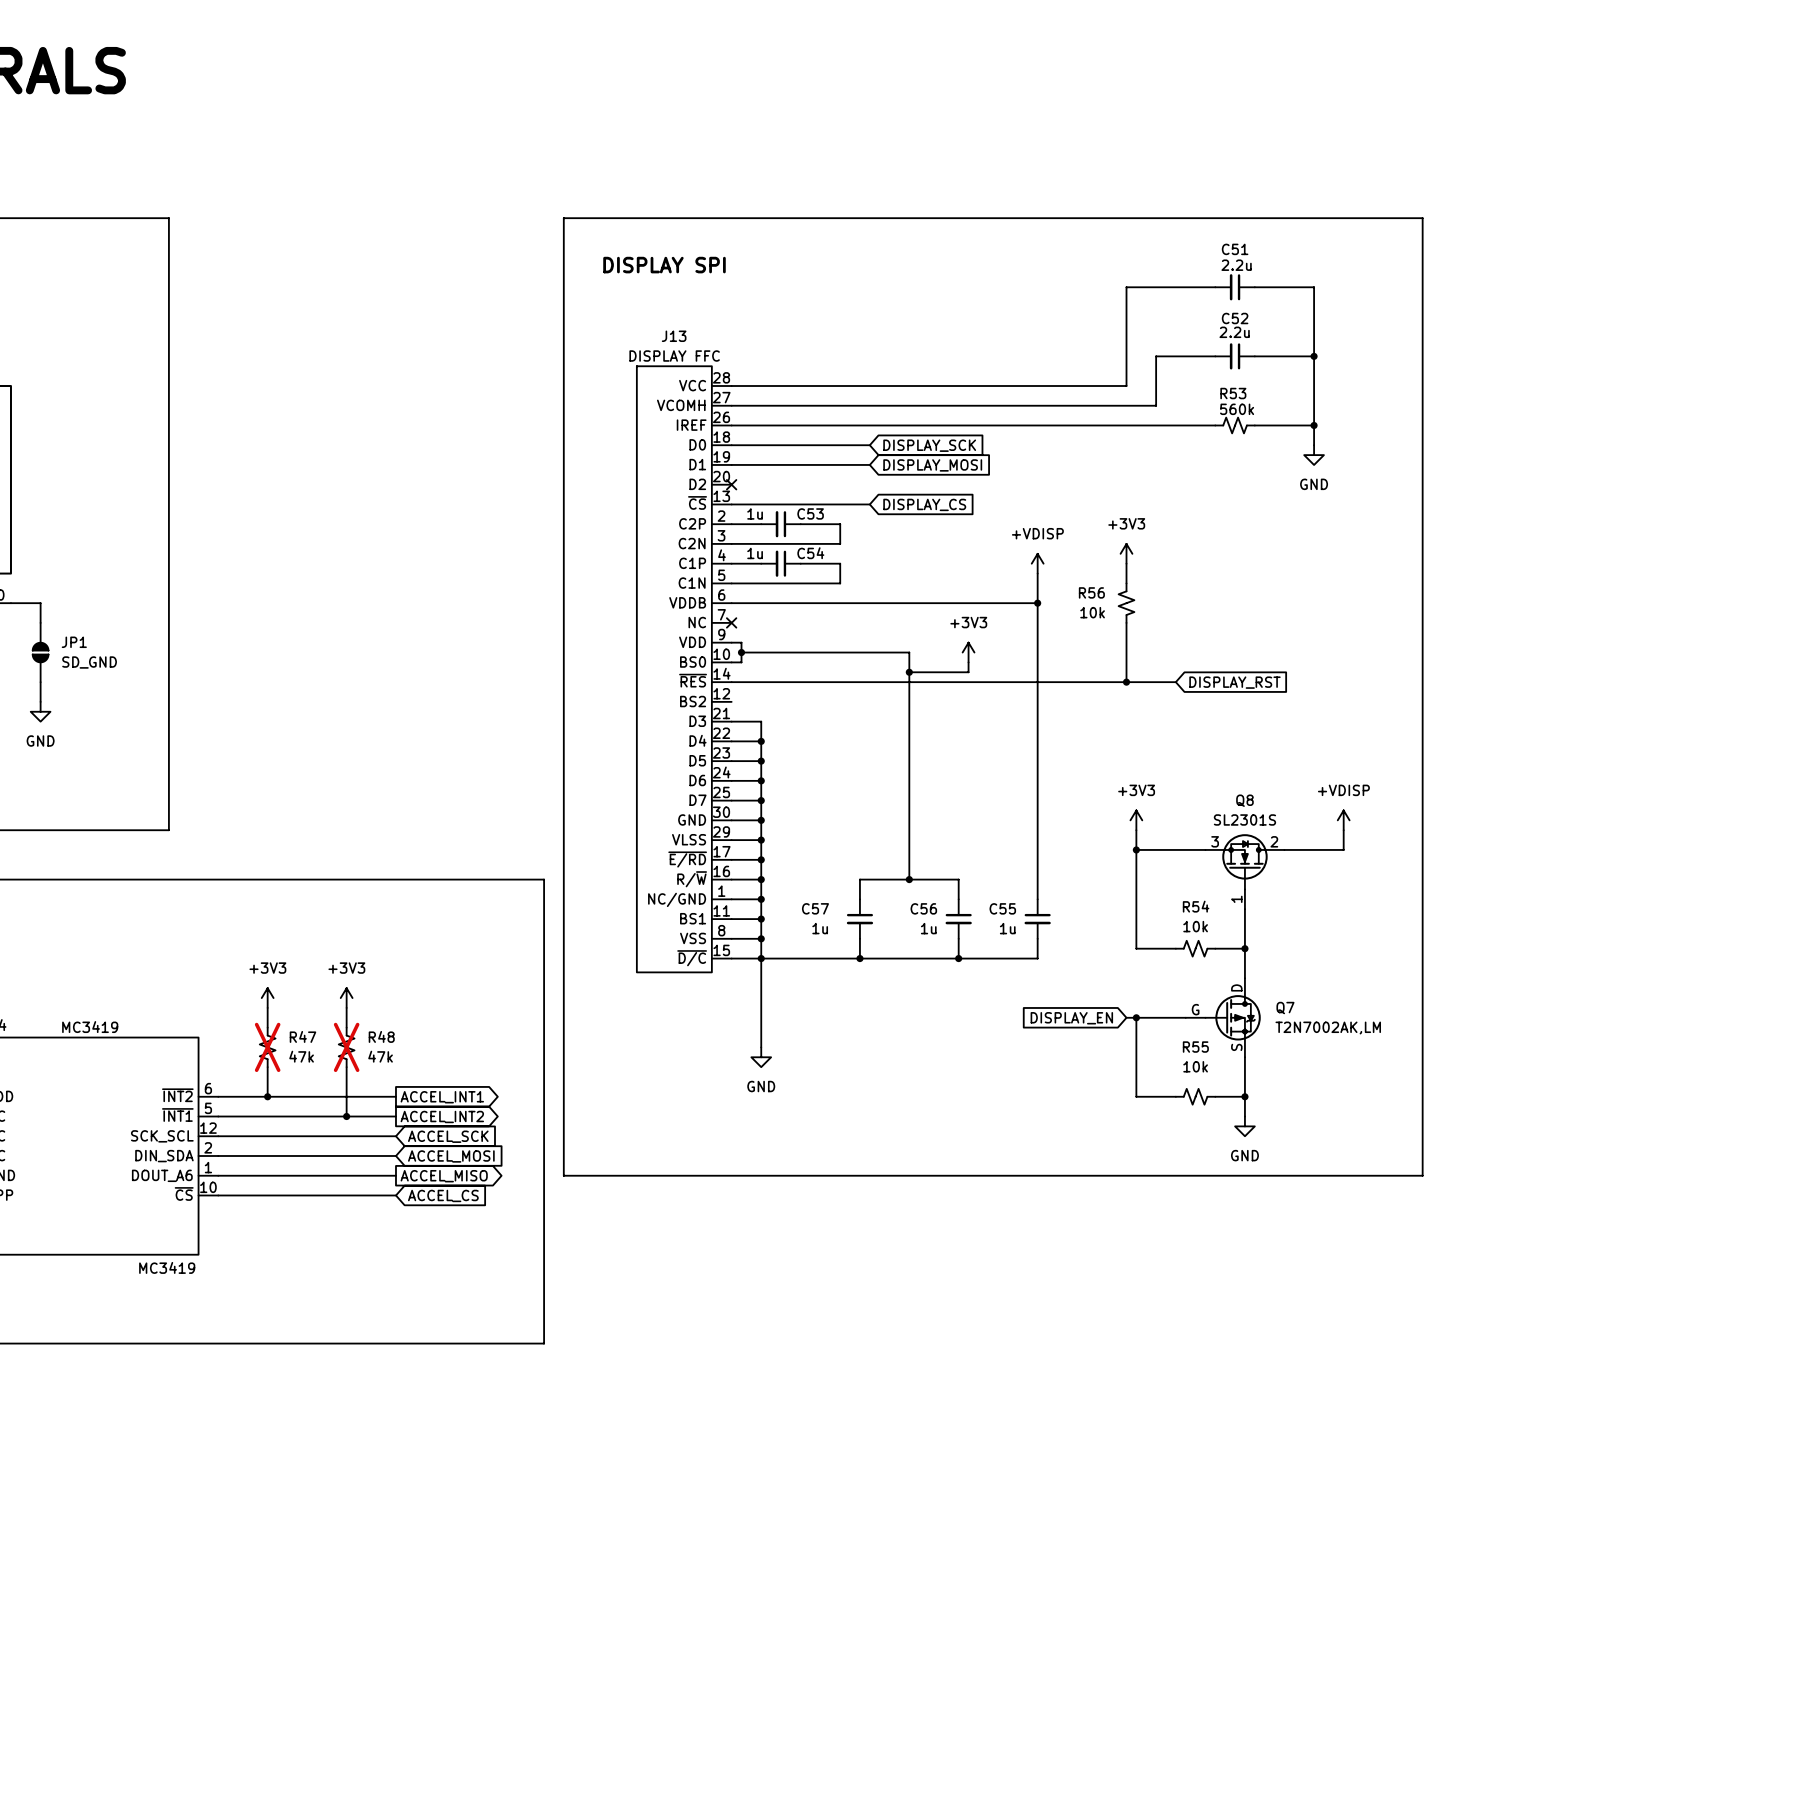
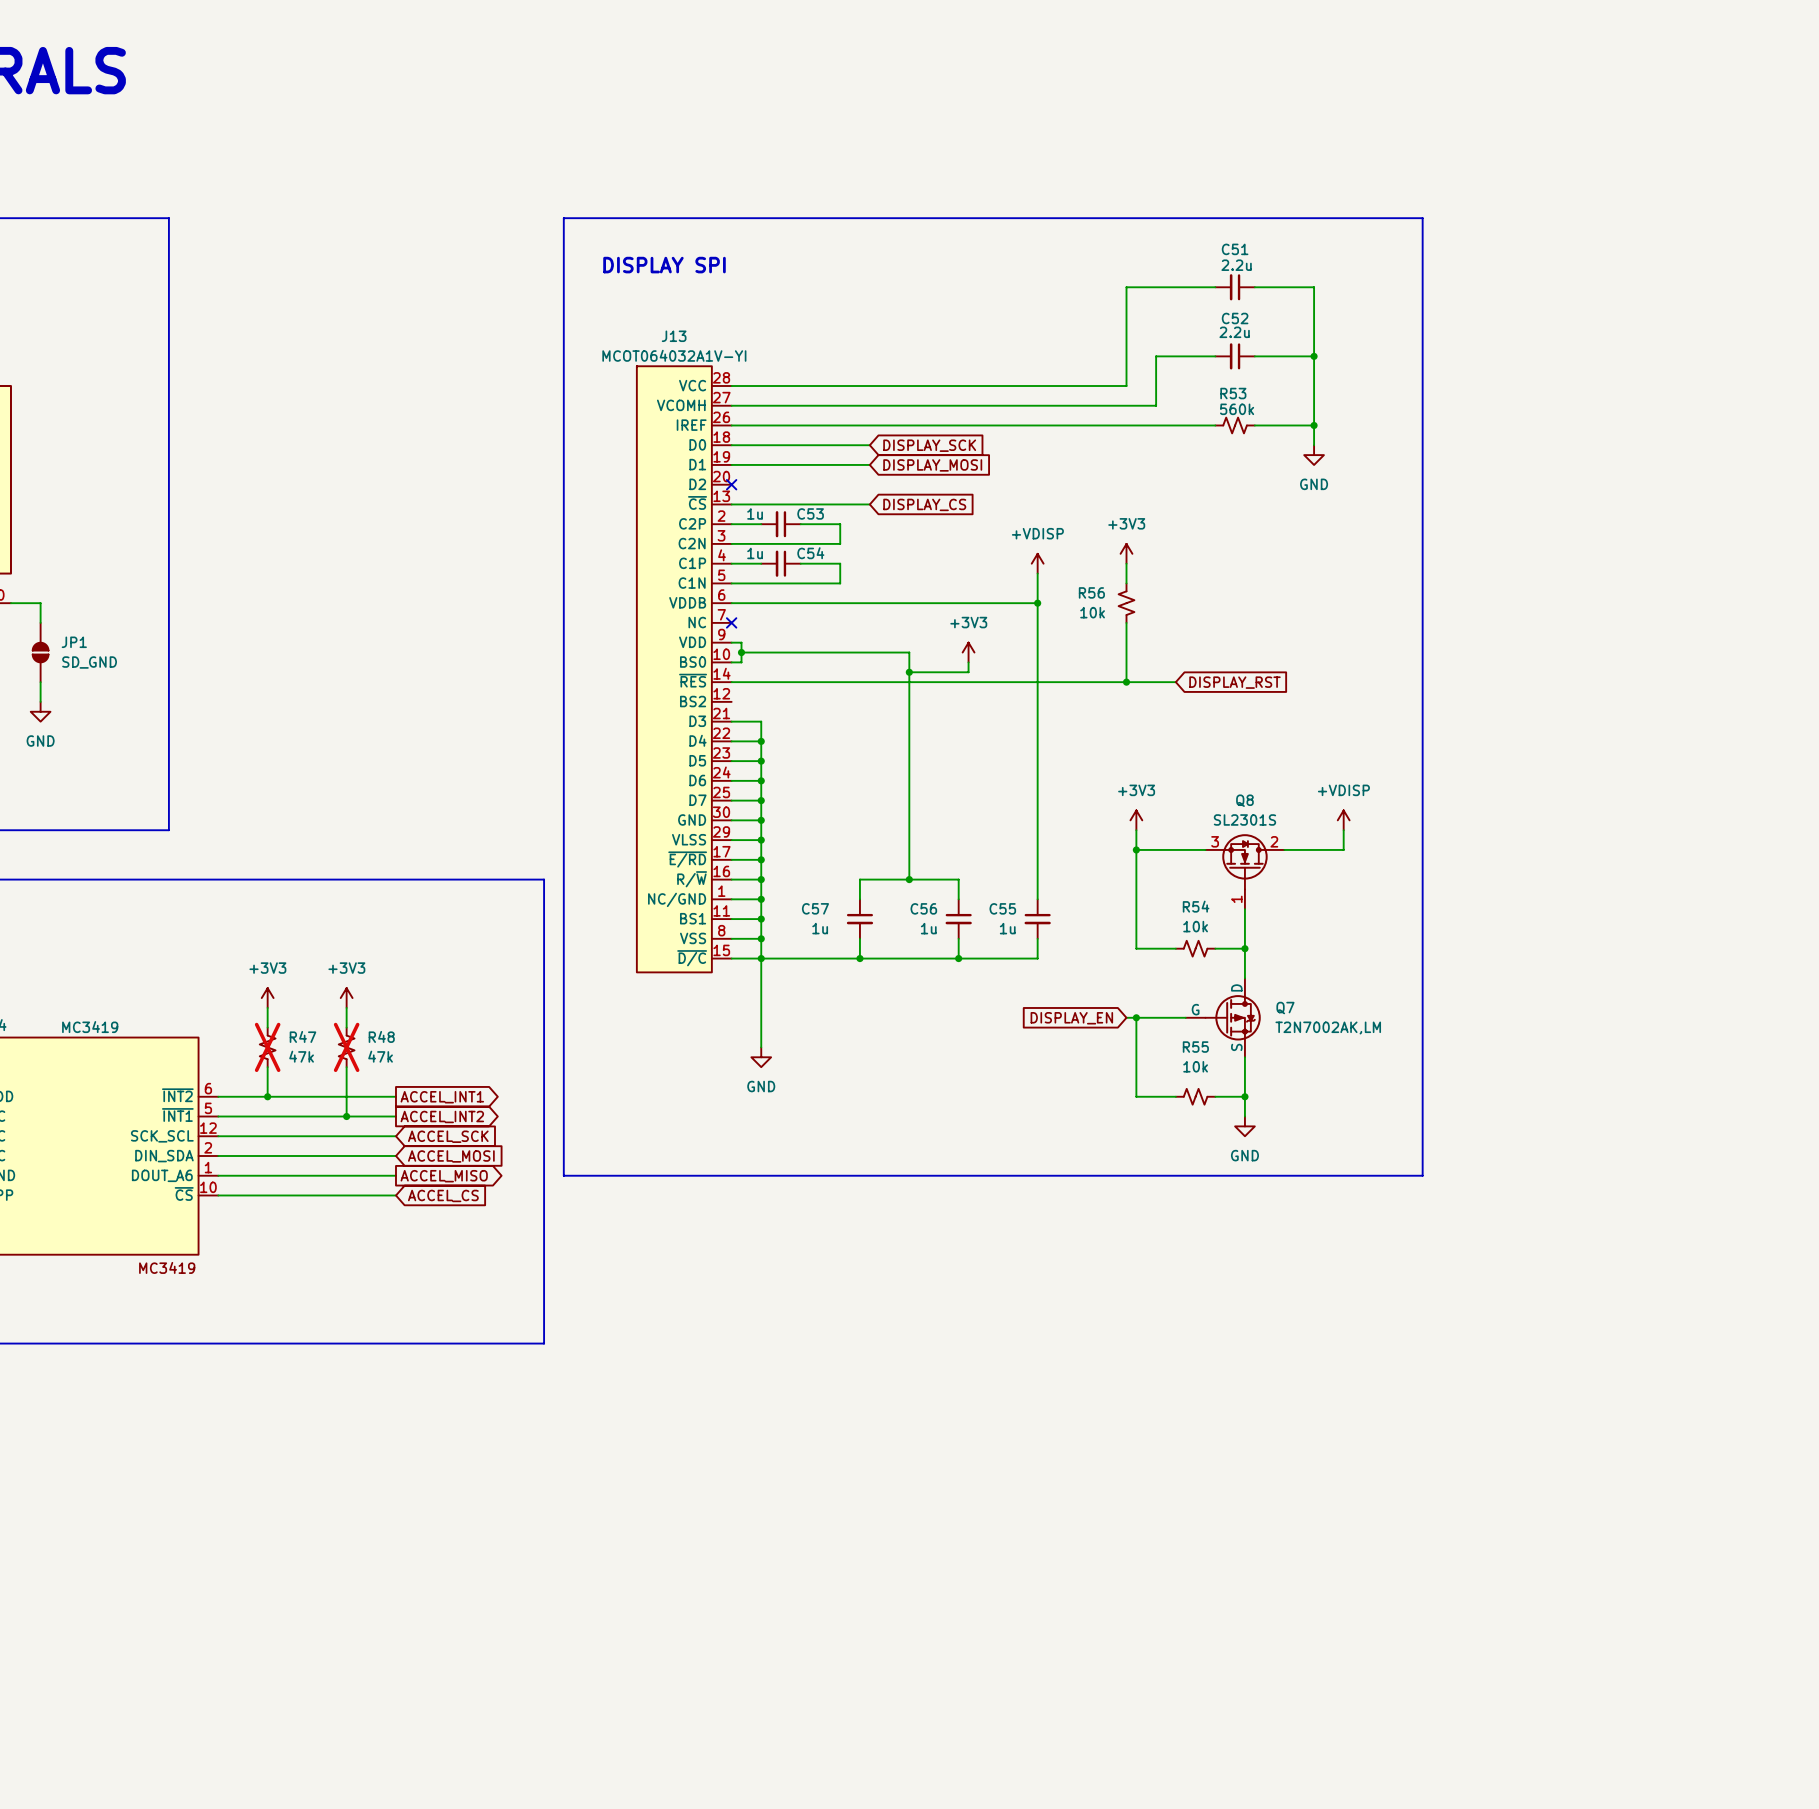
J13 value: DISPLAY FFC (674, 356) -> MCOT064032A1V-YI (674, 355)

